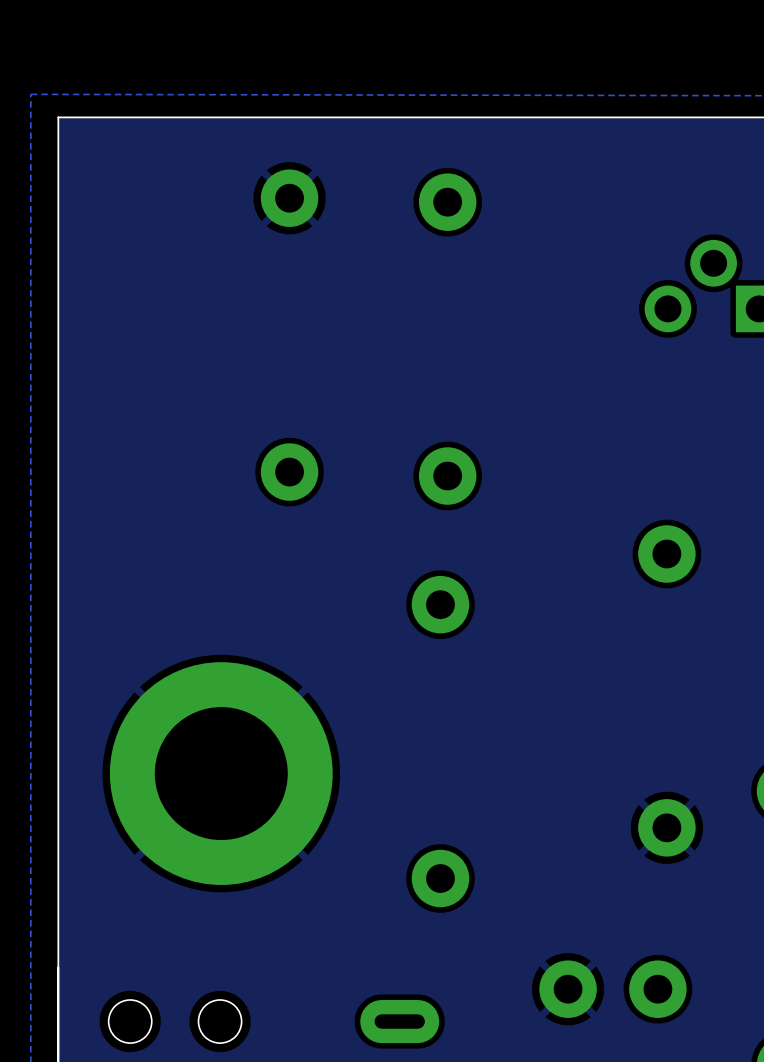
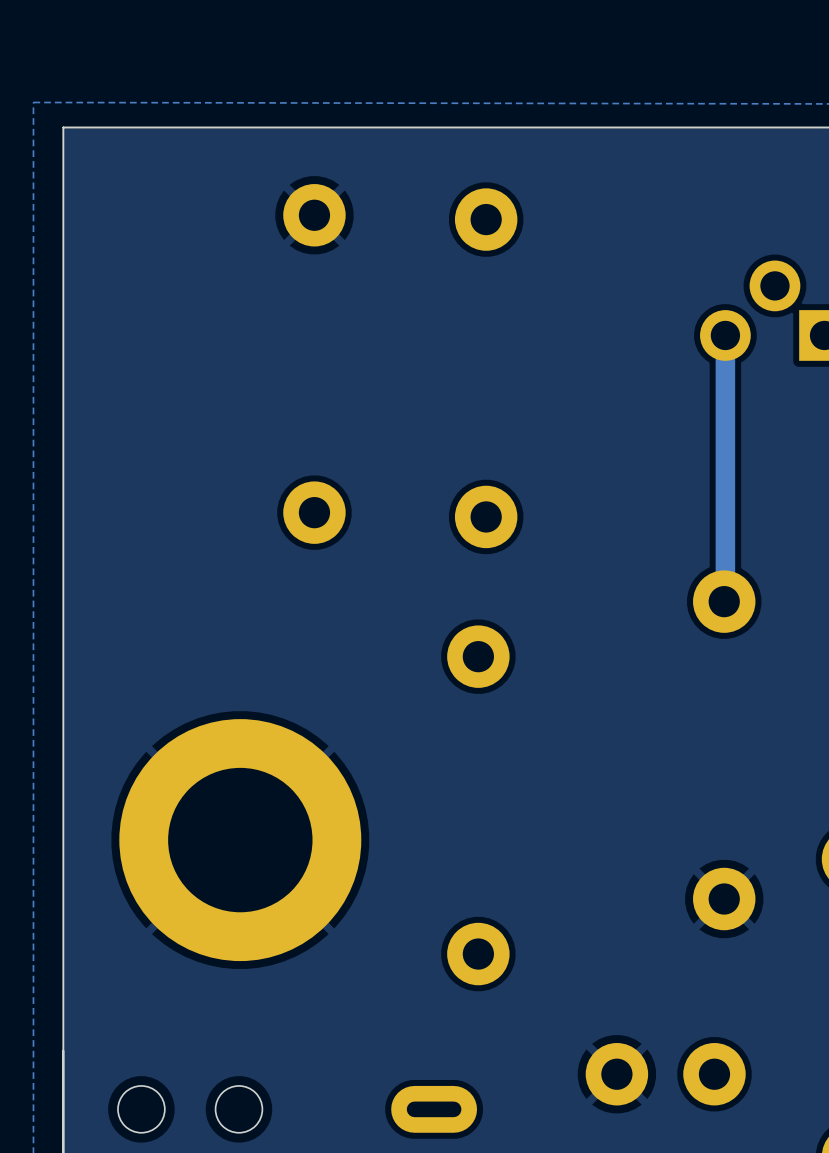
track: none -> (725, 335) (725, 599)

